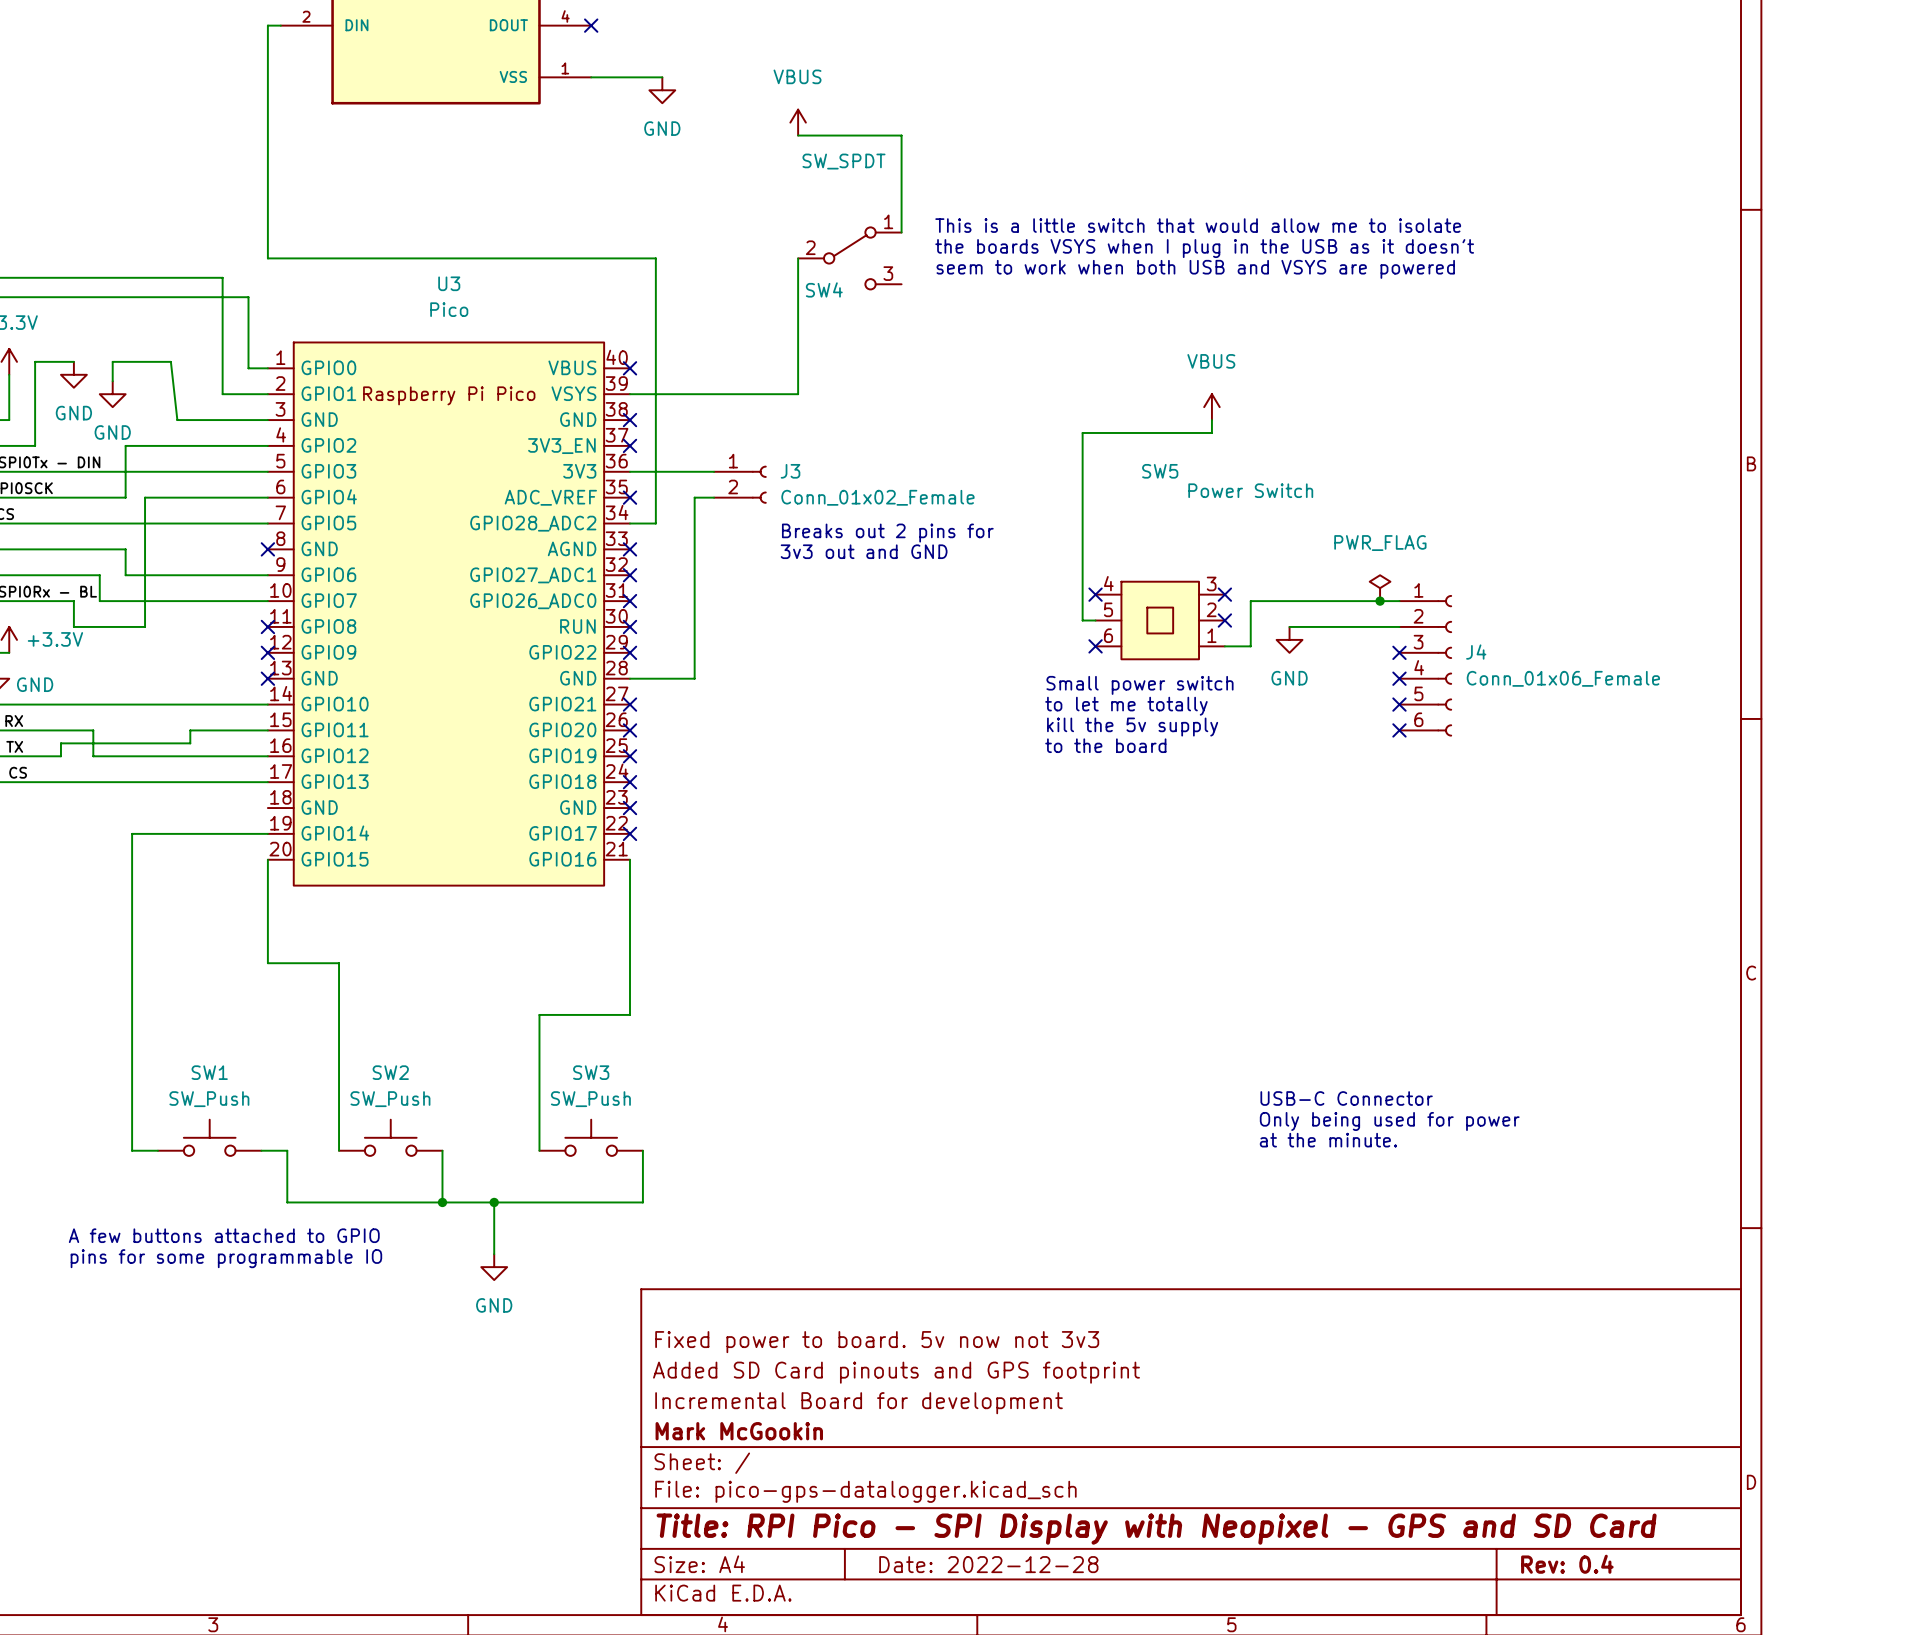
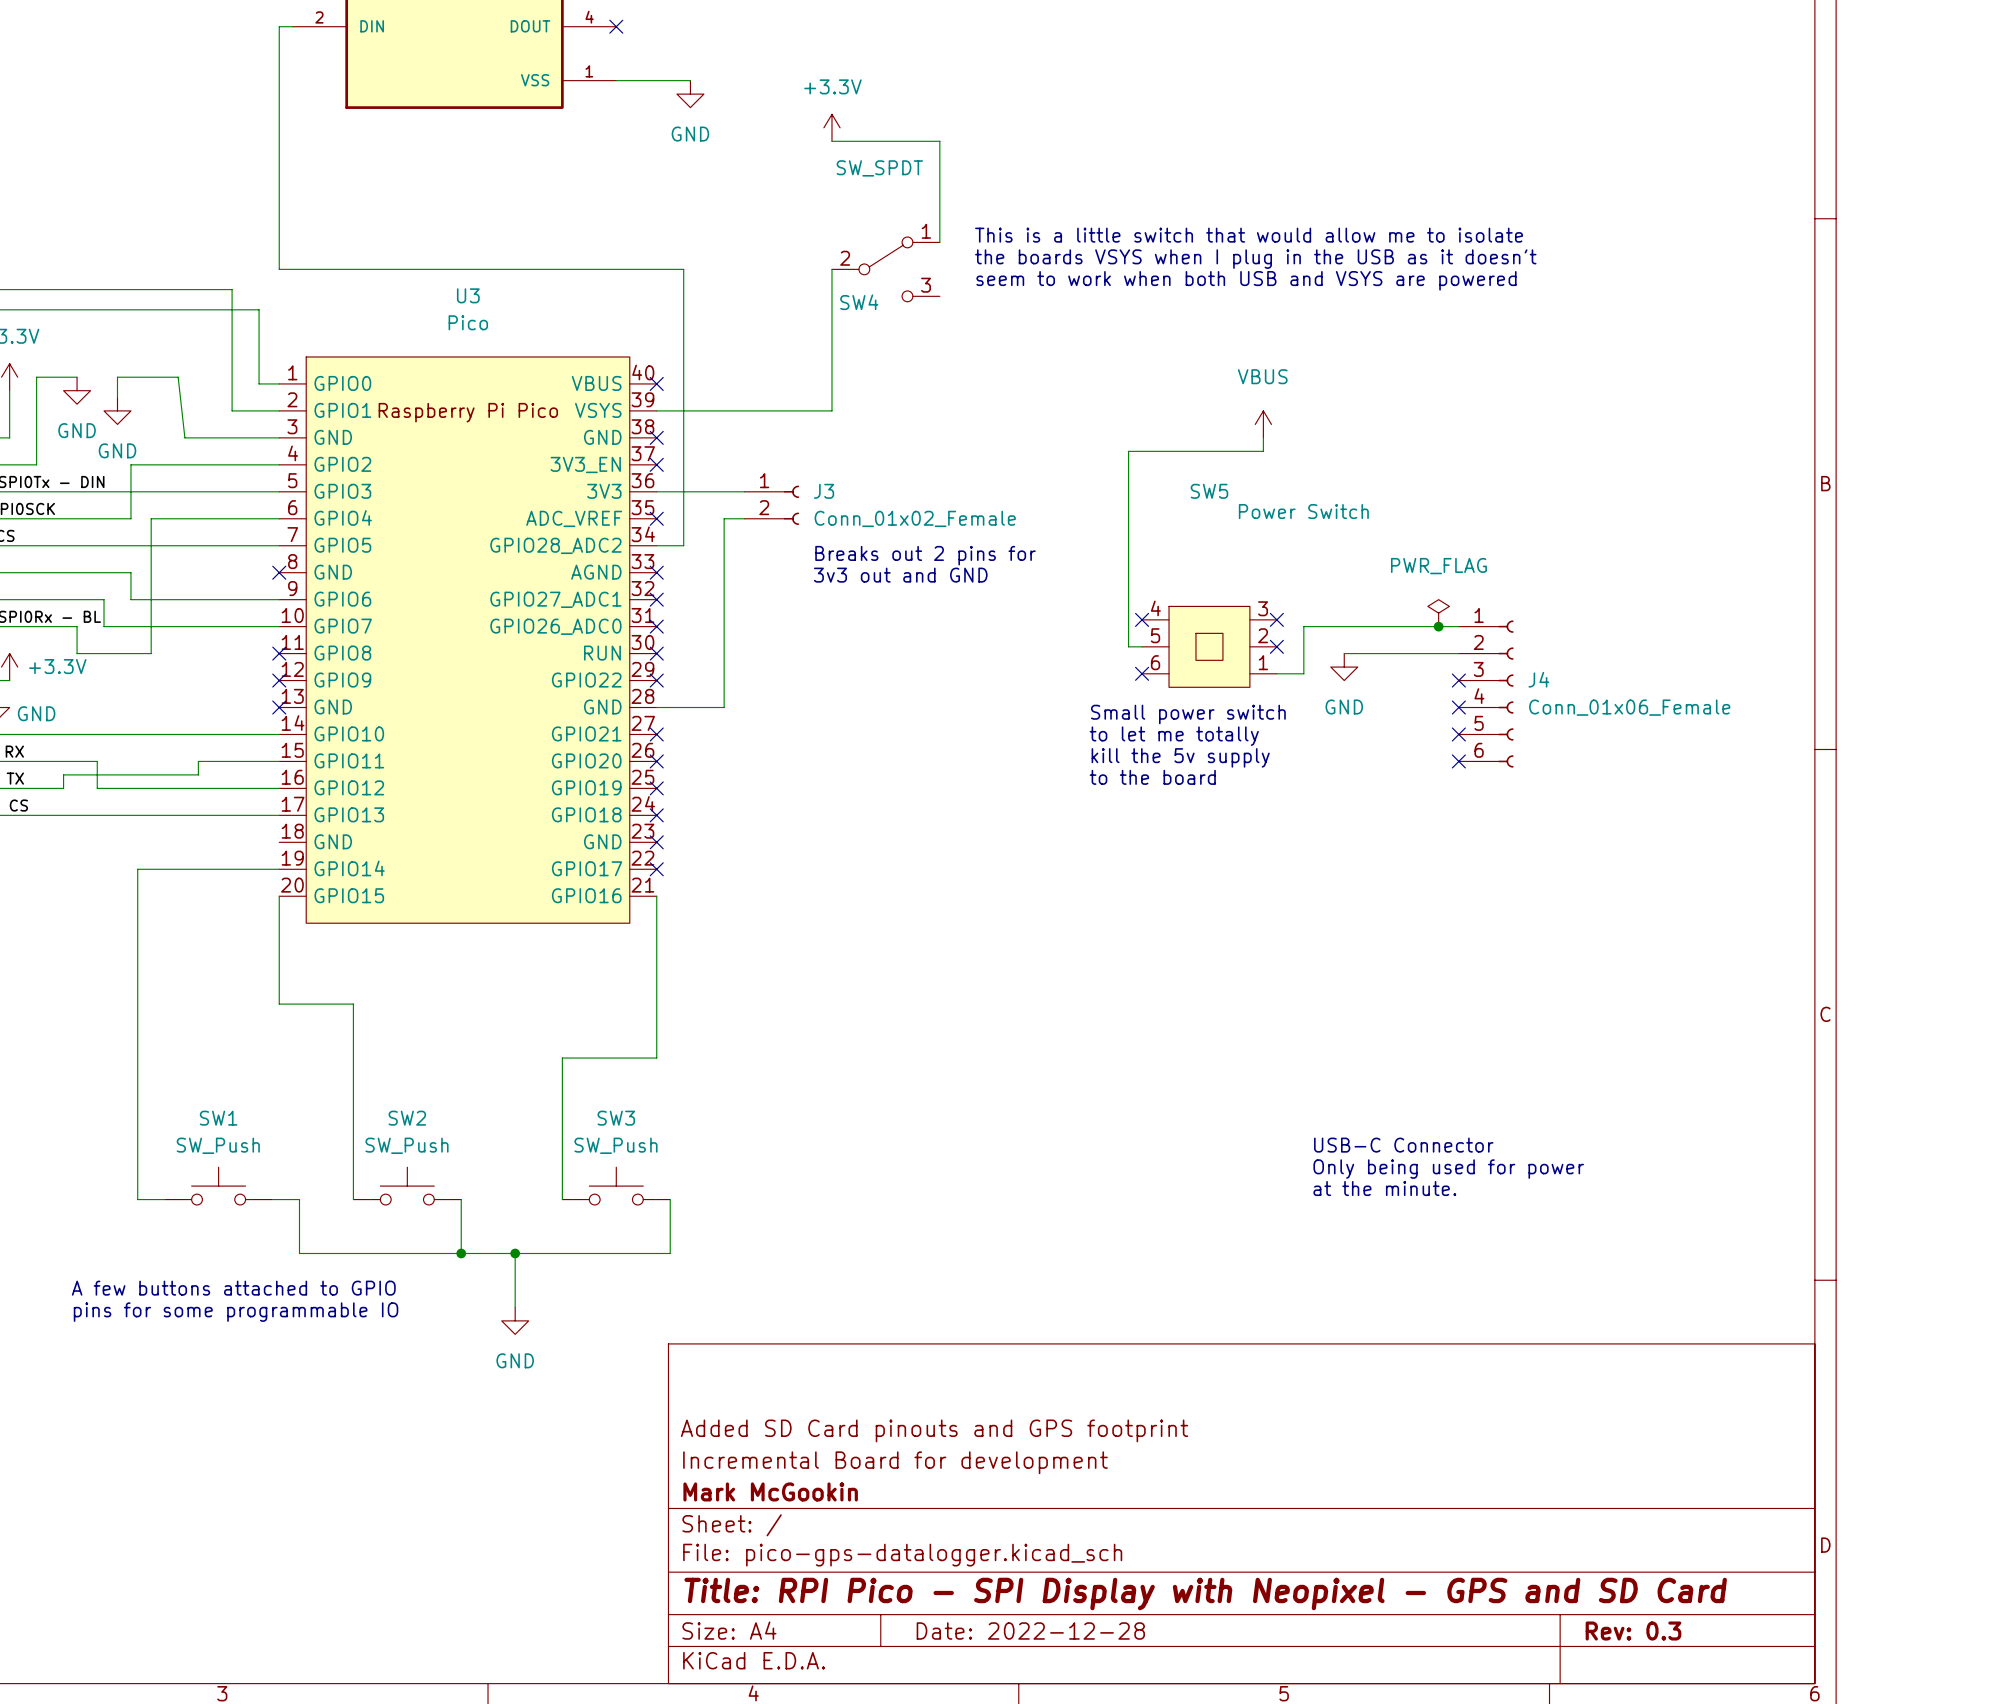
power symbol: VBUS (798, 122) -> +3.3V (831, 127)
title block: Fixed power to board. 5v now not 3v3 (877, 1342) -> none
title block: Rev: 0.4 (1567, 1564) -> Rev: 0.3 (1633, 1631)

